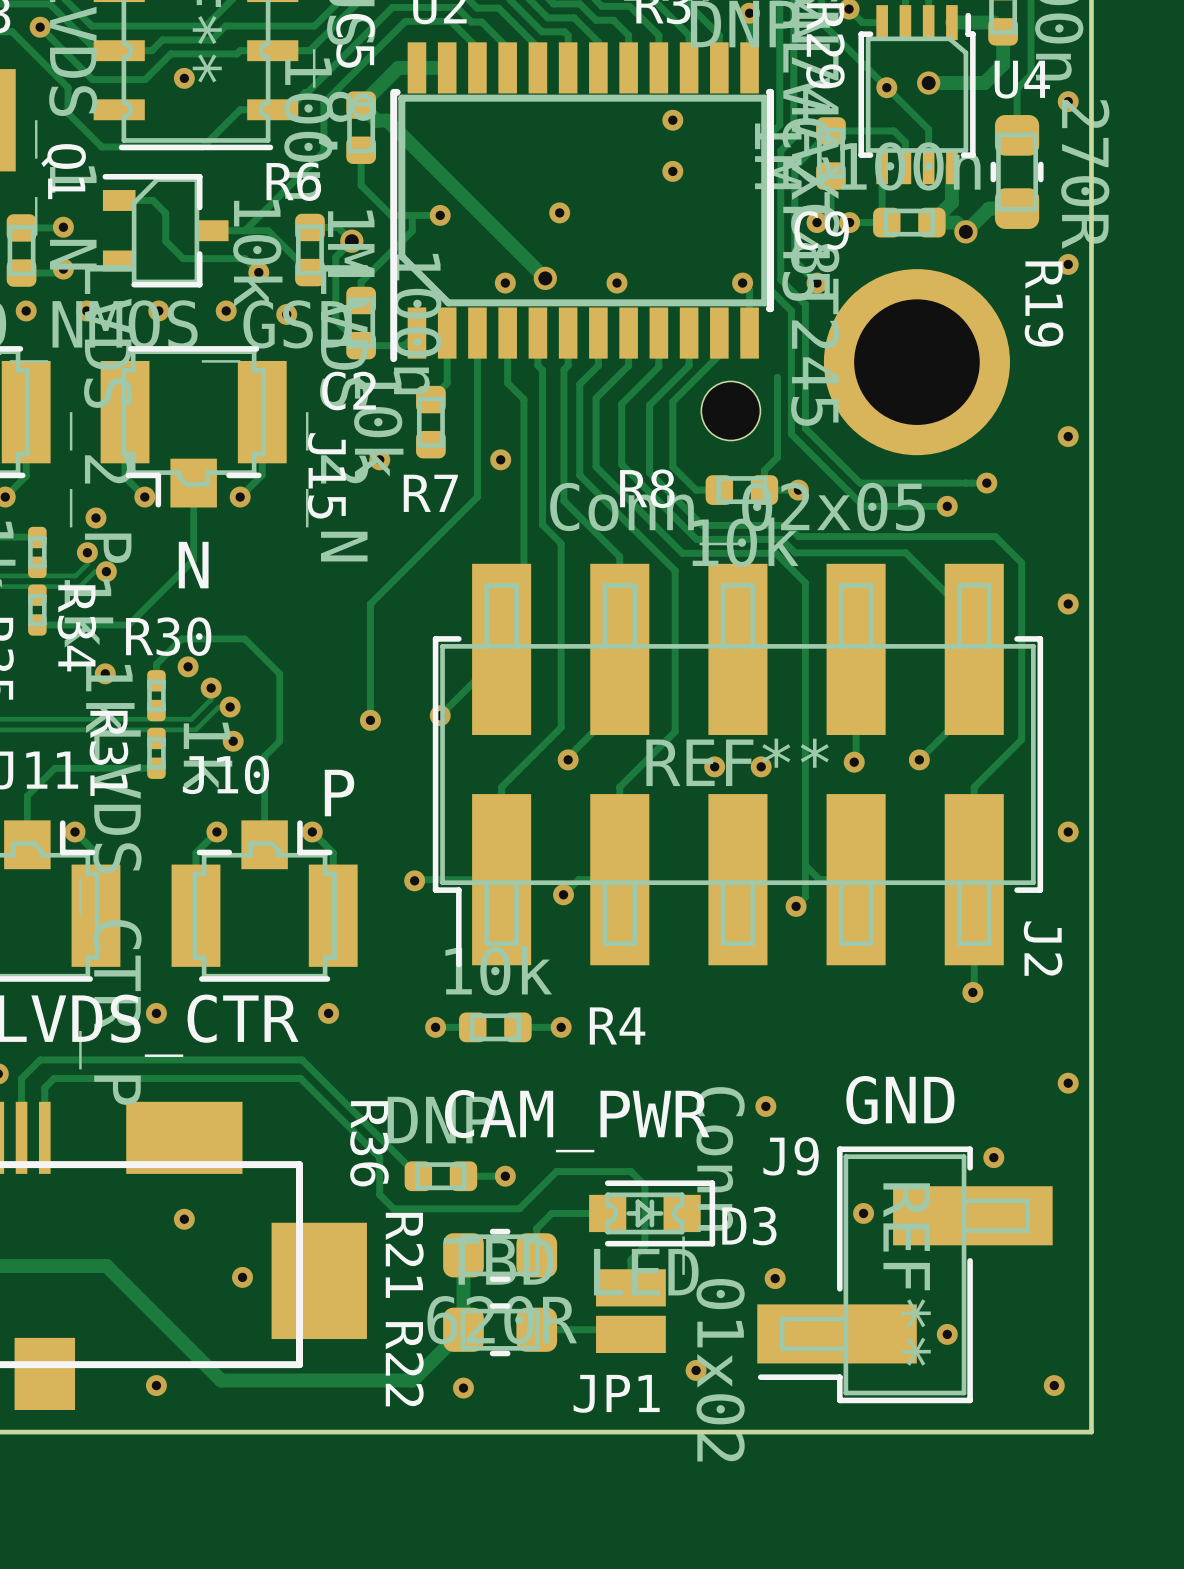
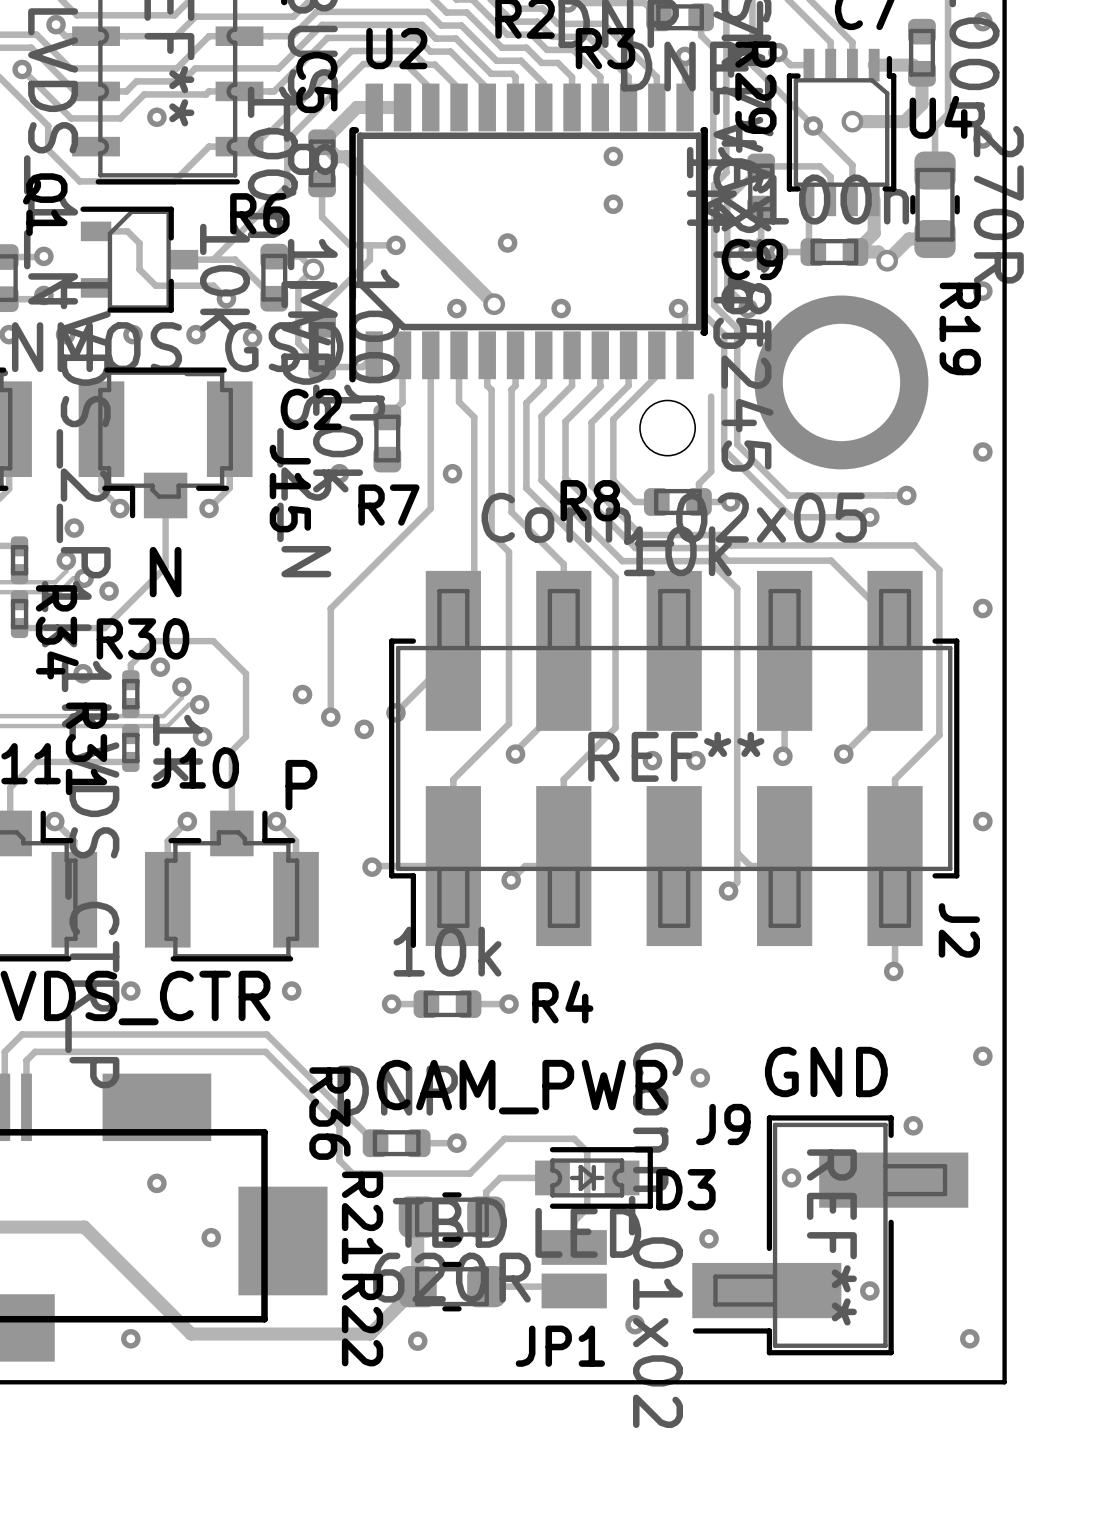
via: none -> (109, 591)
via: none -> (302, 694)
via: none -> (364, 729)

